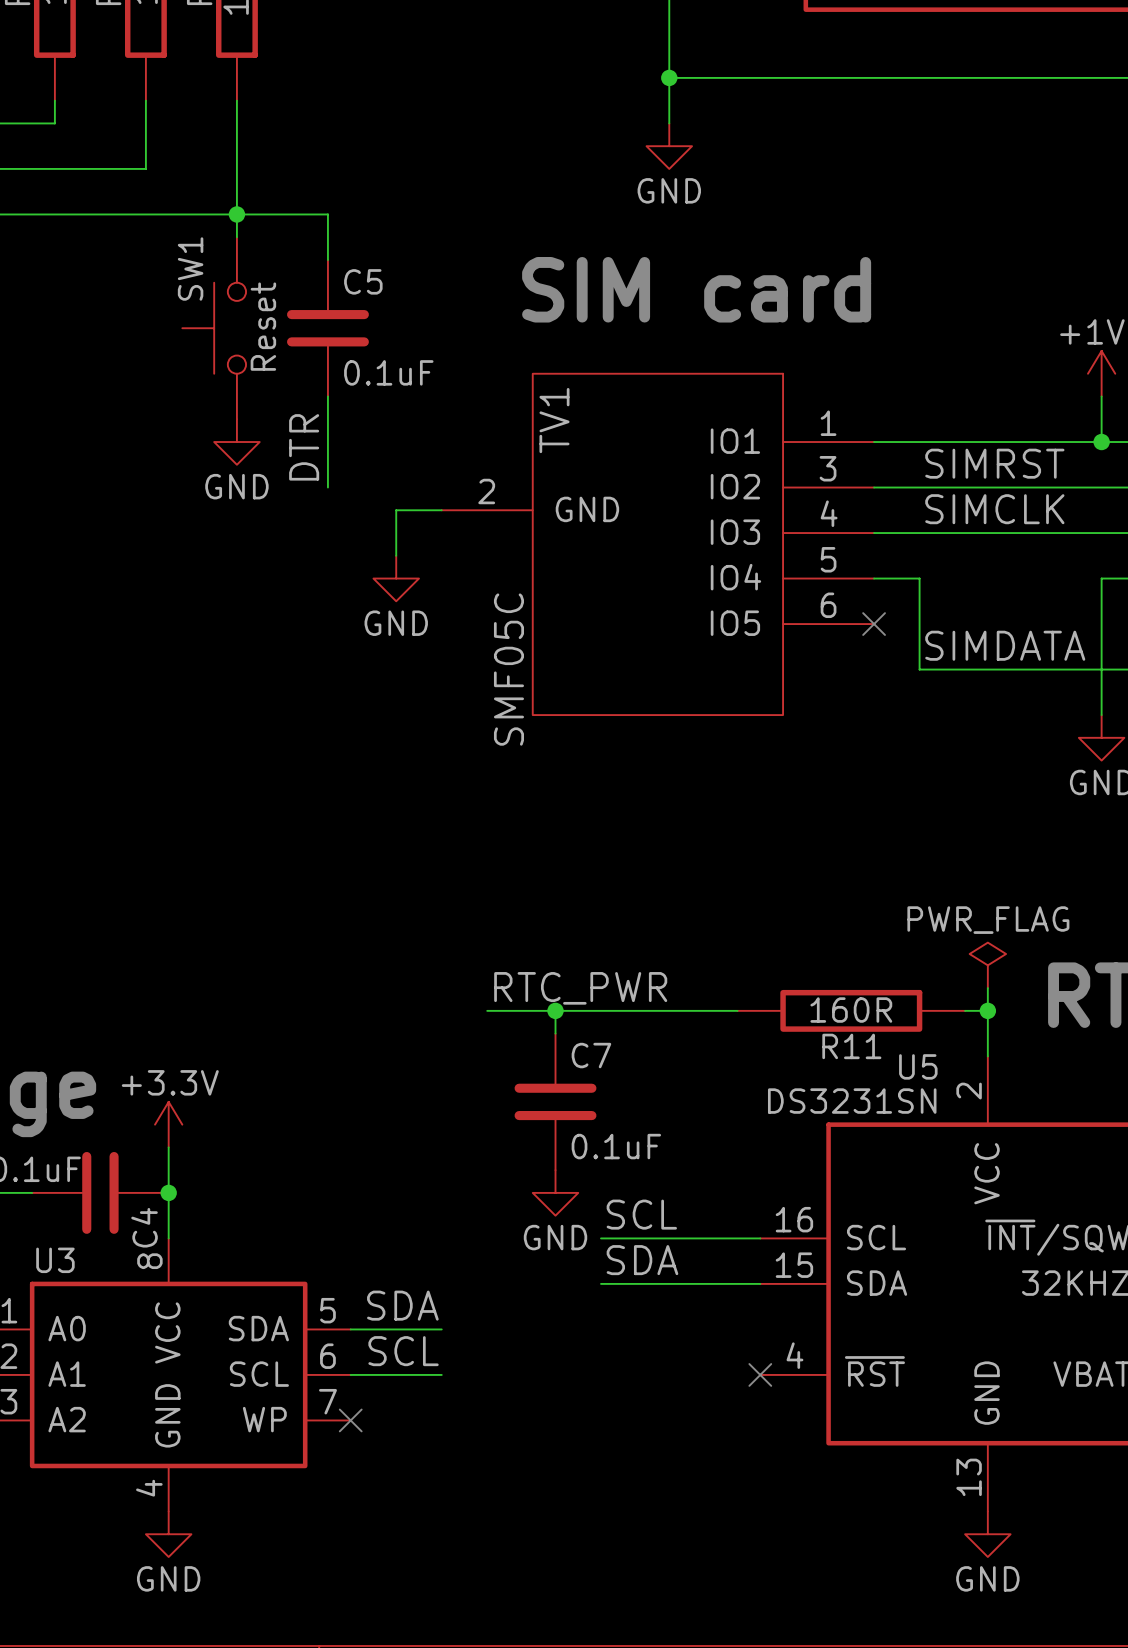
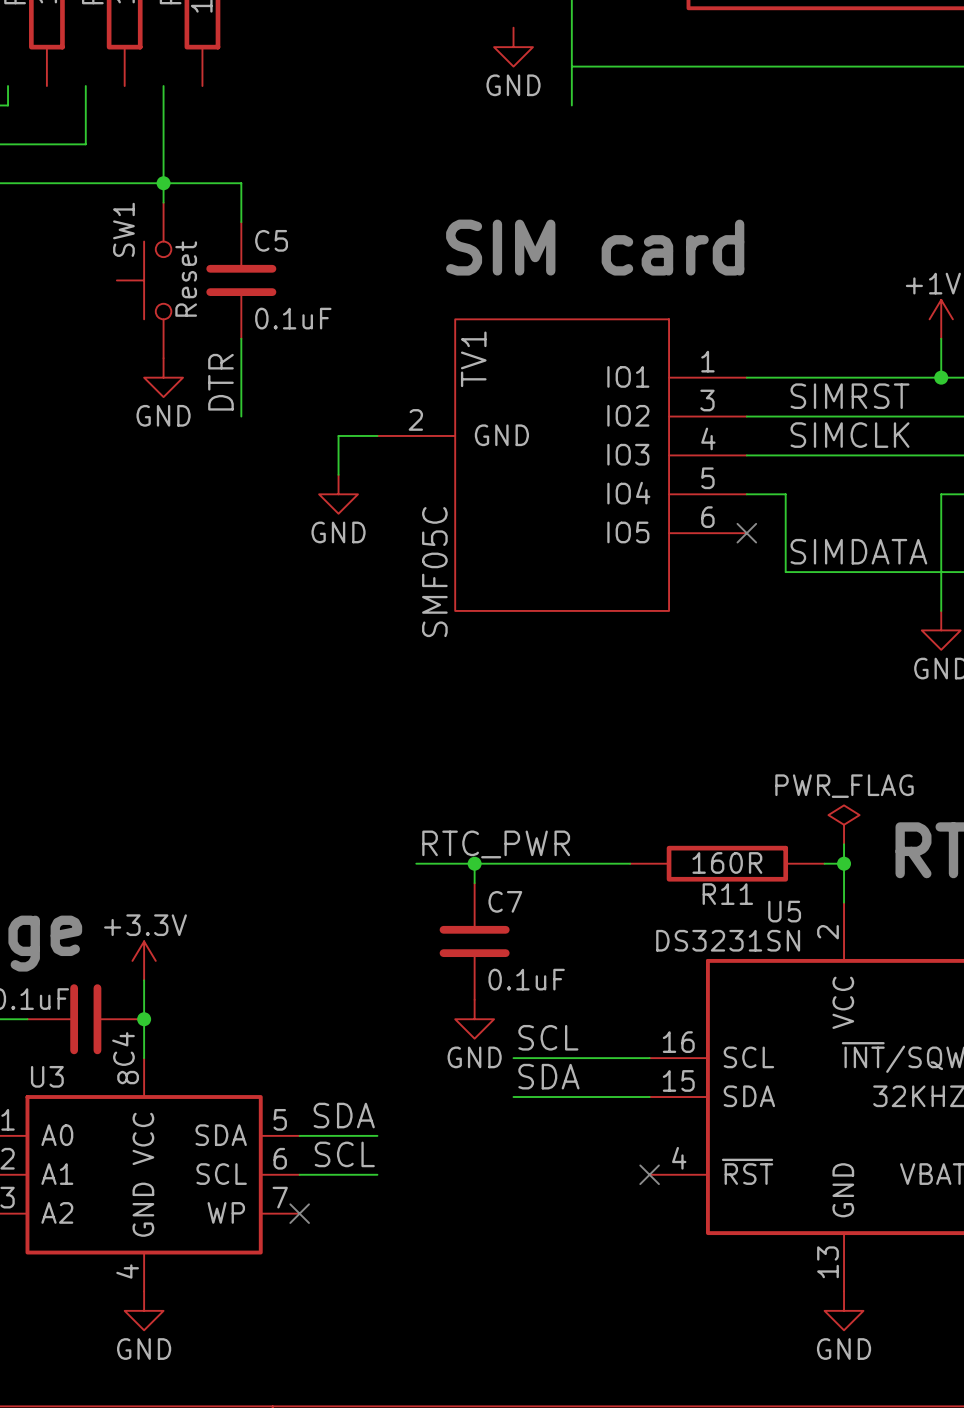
junction: (669, 77) -> none
wire: (54, 100) (54, 123) (9, 123) -> (8, 86) (8, 105)
wire: (145, 100) (145, 168) (100, 168) -> (85, 86) (85, 144)
wire: (236, 100) (236, 237) -> (163, 86) (163, 202)
power symbol position: GND (669, 146) -> GND (513, 47)
junction position: (236, 214) -> (163, 183)
wire: (282, 214) (327, 214) (327, 259) -> (241, 183) (241, 222)
SW1 position: (214, 328) -> (144, 280)
C5 position: (327, 328) -> (241, 280)
wire: (327, 396) (327, 487) -> (241, 338) (241, 416)
power symbol position: GND (236, 442) -> GND (163, 377)
label position: DTR (304, 447) -> DTR (220, 382)

